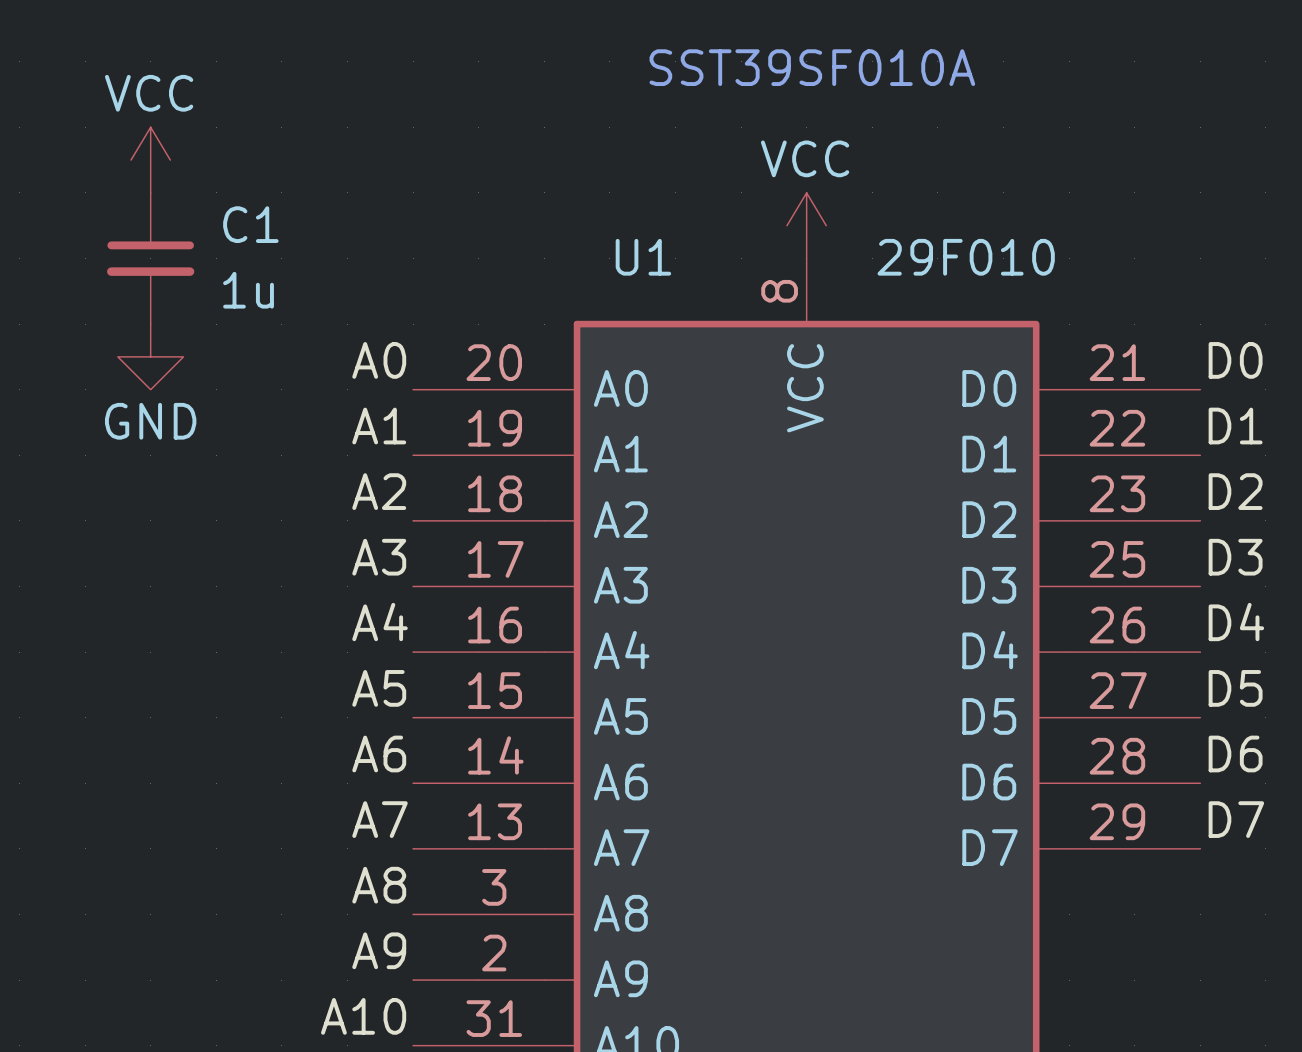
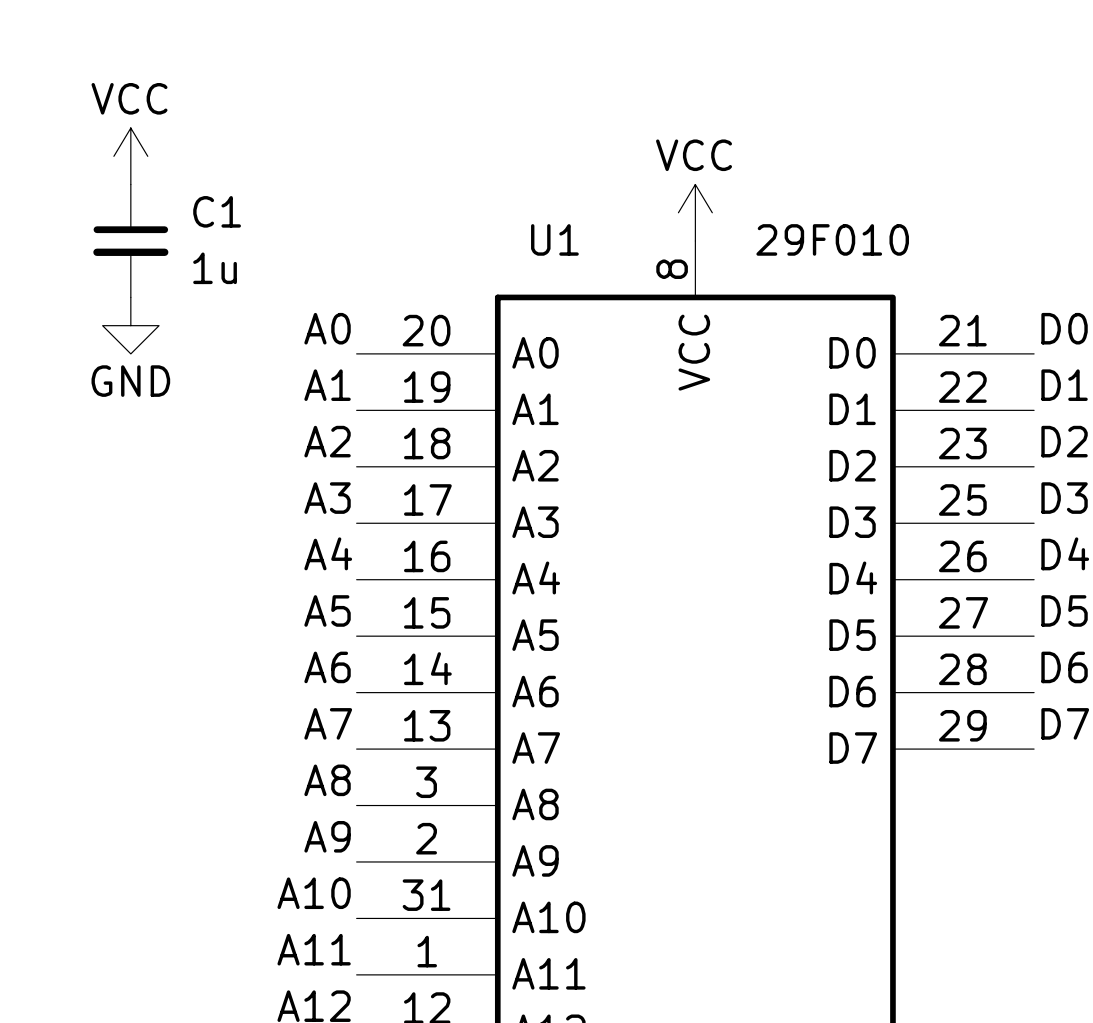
text: SST39SF010A (812, 67) -> none

